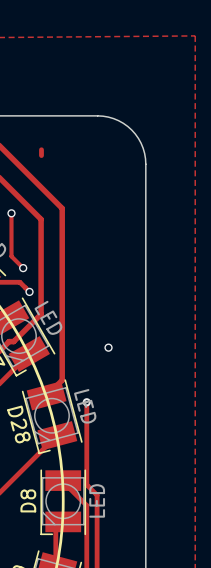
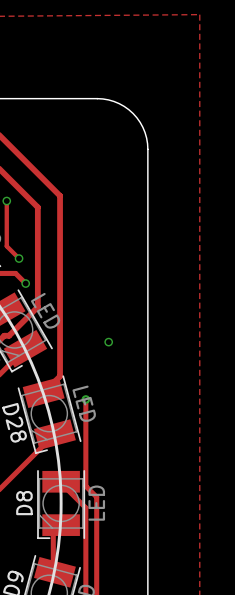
track: (41, 149) (41, 155) -> none

